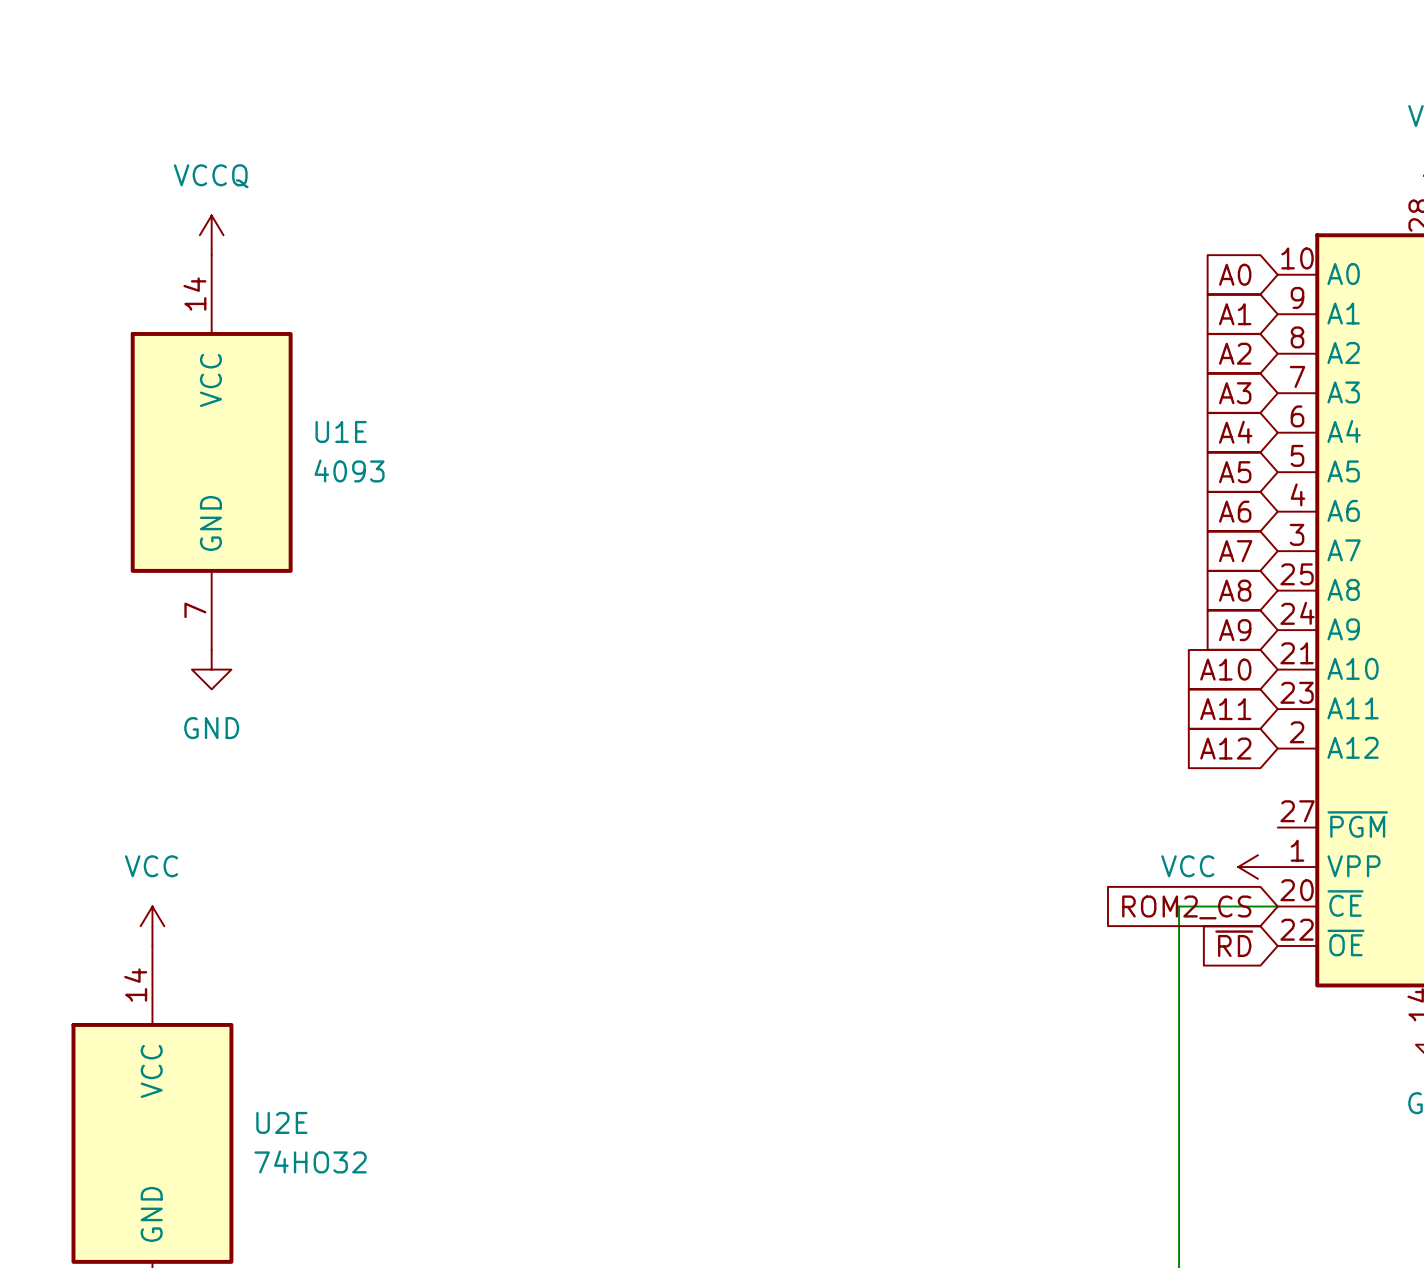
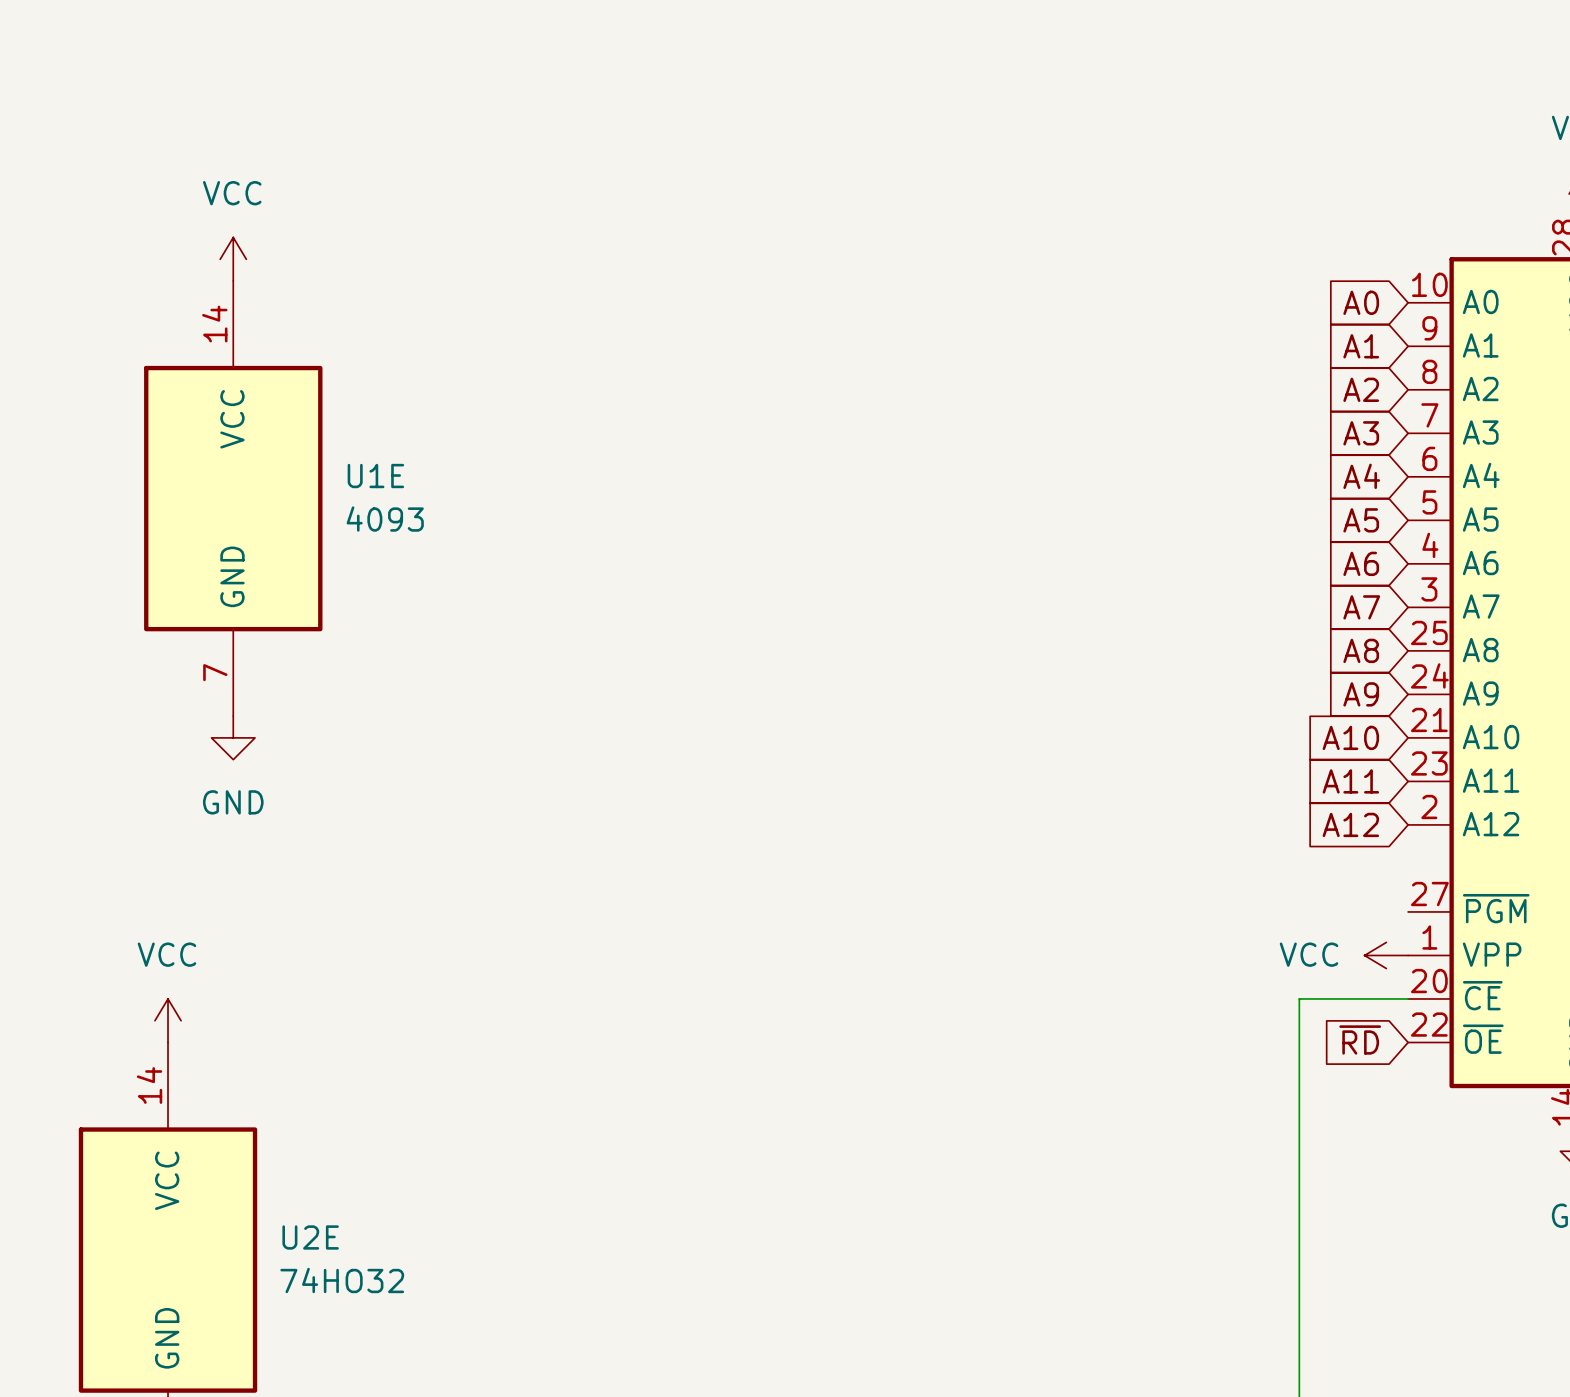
power symbol: VCCQ (211, 235) -> VCC (233, 259)
global label: ROM2_CS (1186, 907) -> none

